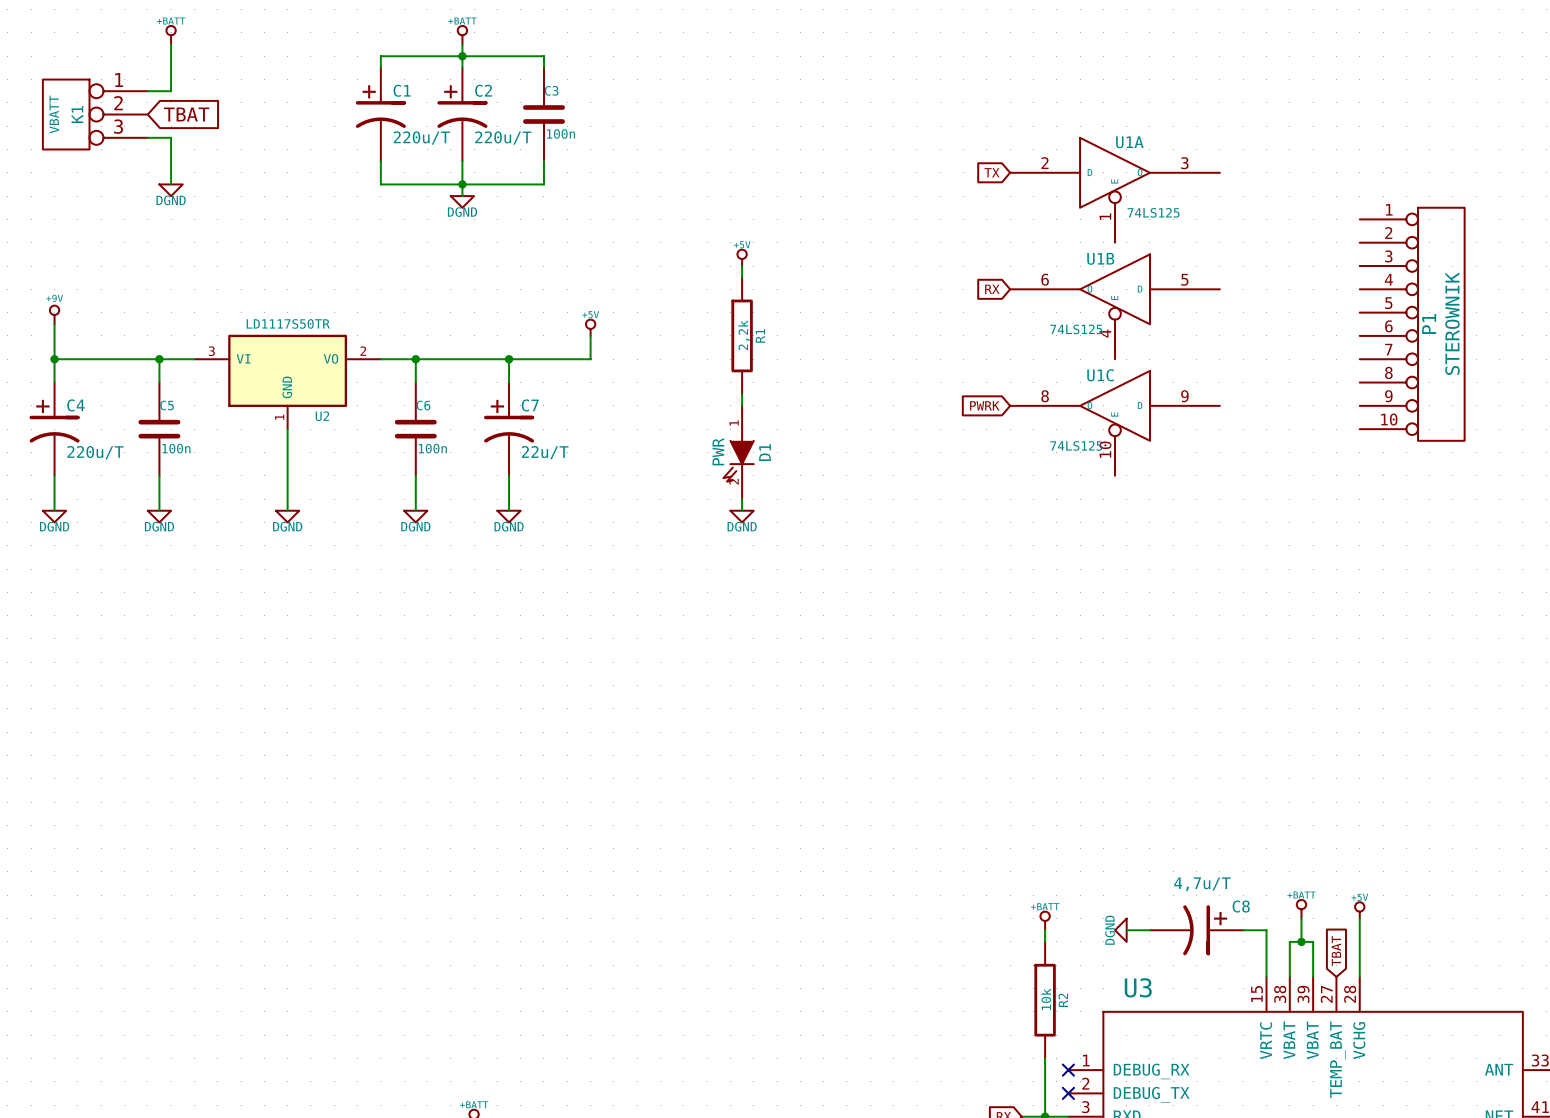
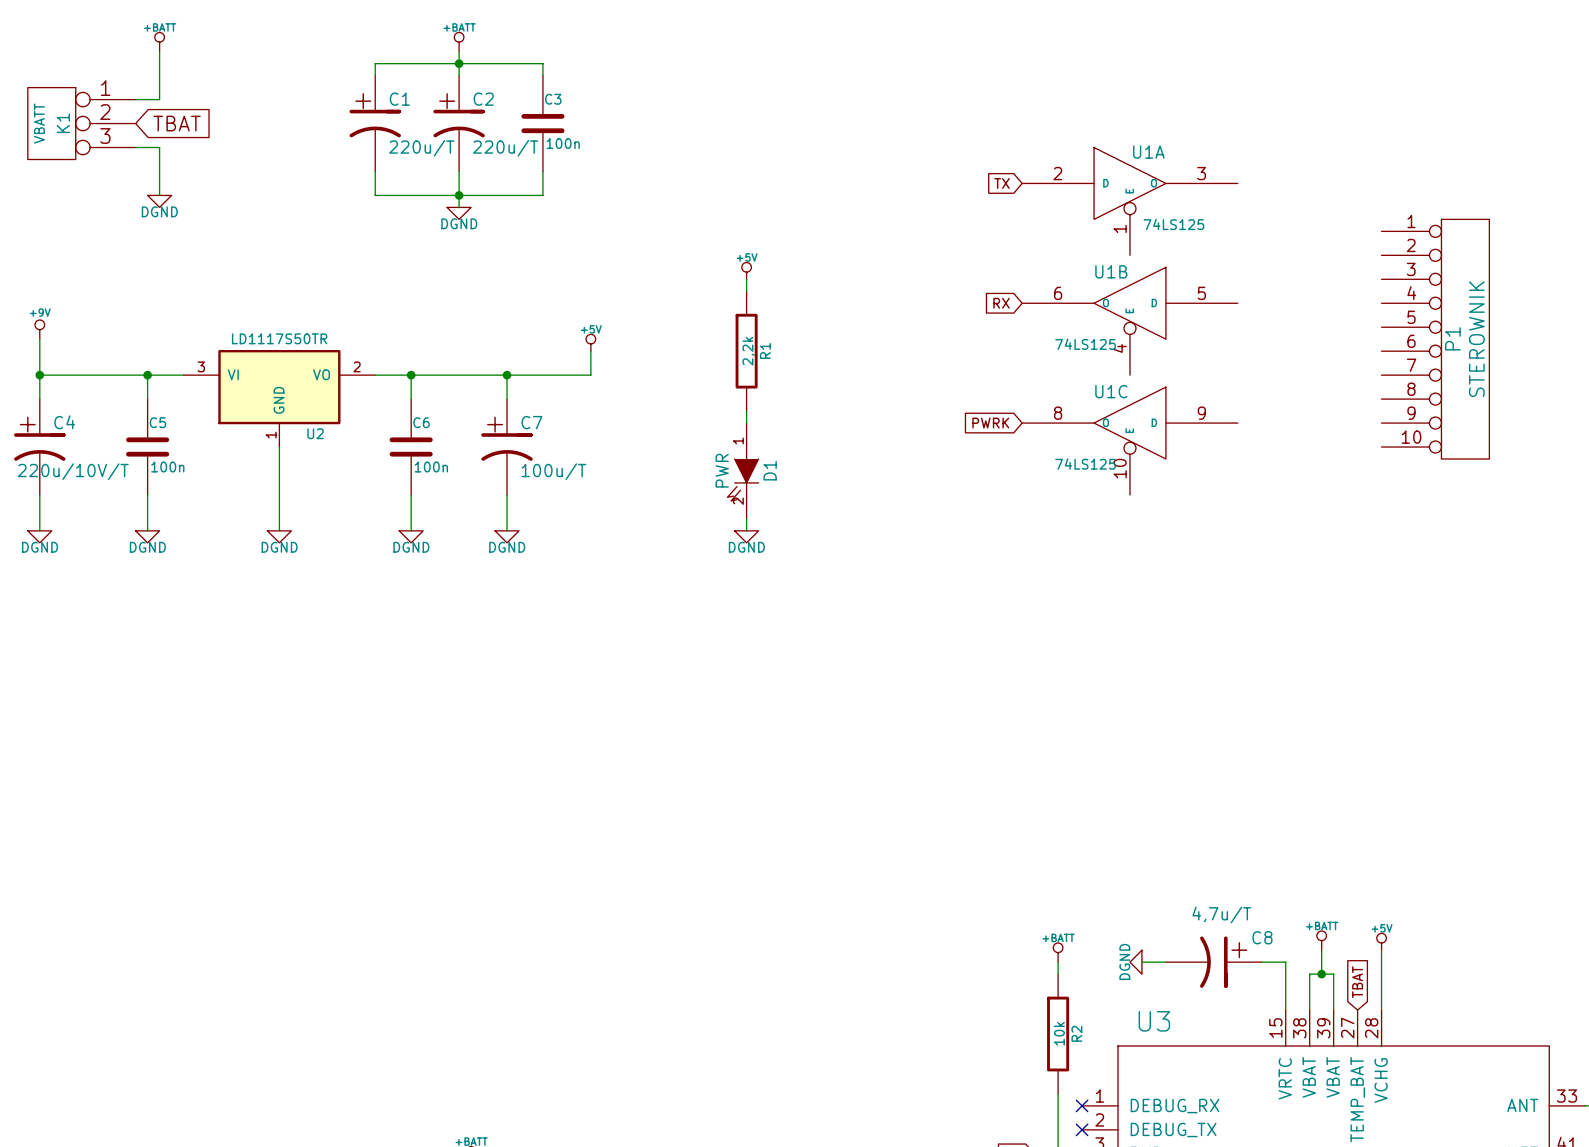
C4 value: 220u/T (95, 452) -> 220u/10V/T (73, 471)
C7 value: 22u/T (545, 452) -> 100u/T (553, 471)

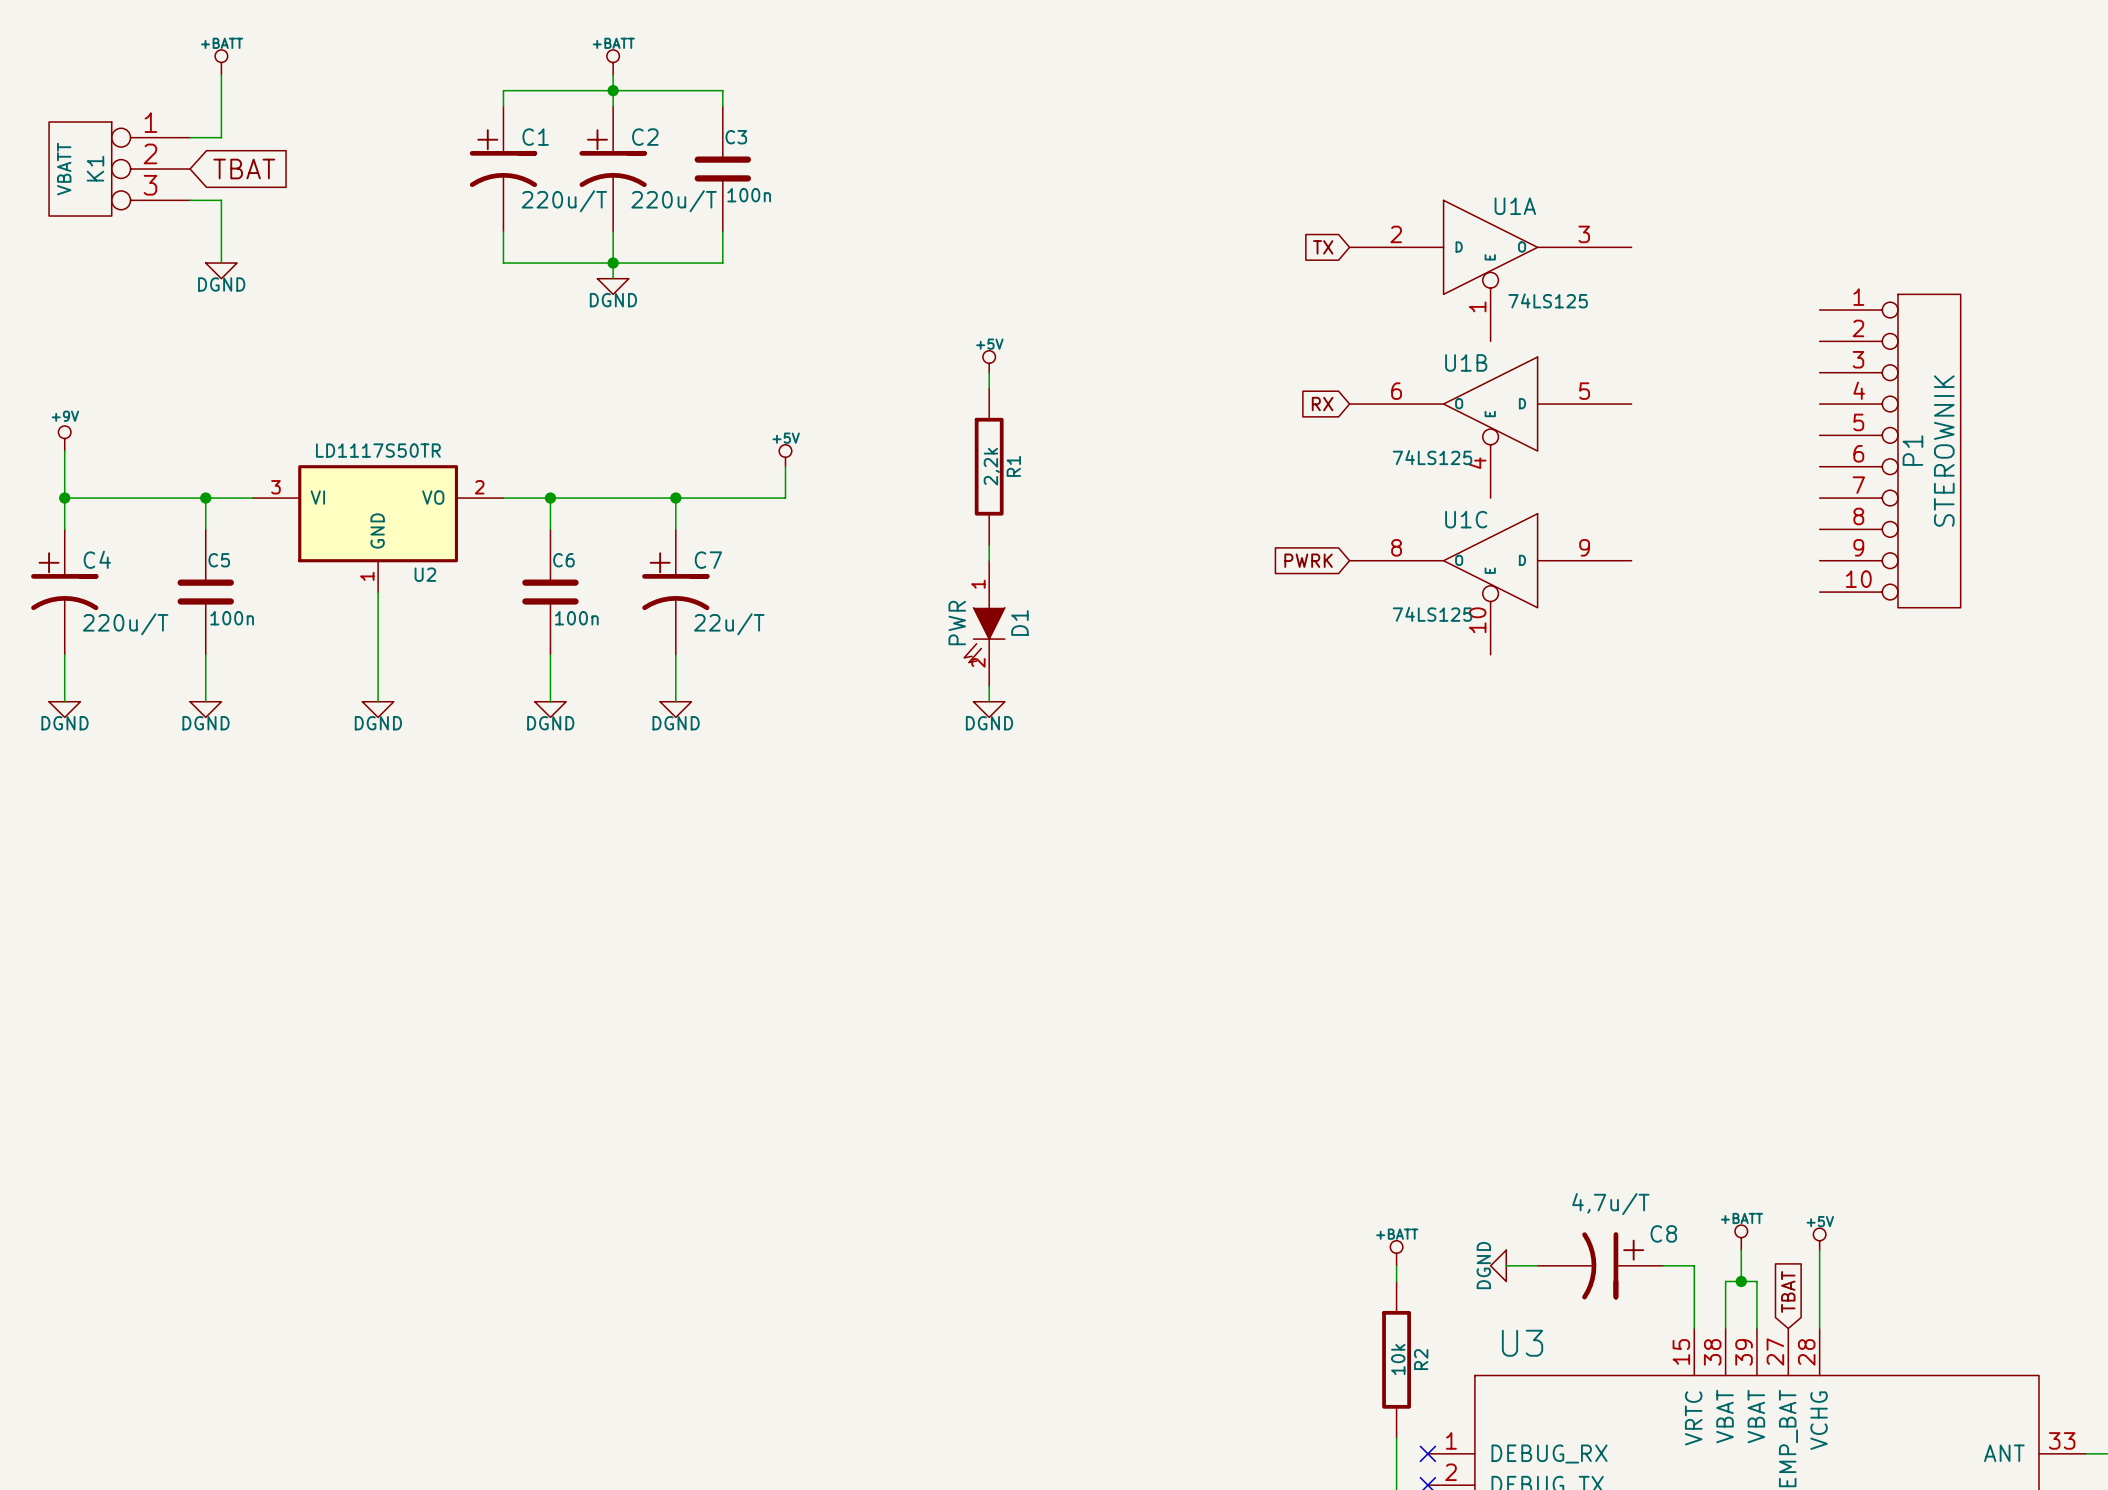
C4 value: 220u/10V/T (73, 471) -> 220u/T (125, 624)
C7 value: 100u/T (553, 471) -> 22u/T (729, 624)

